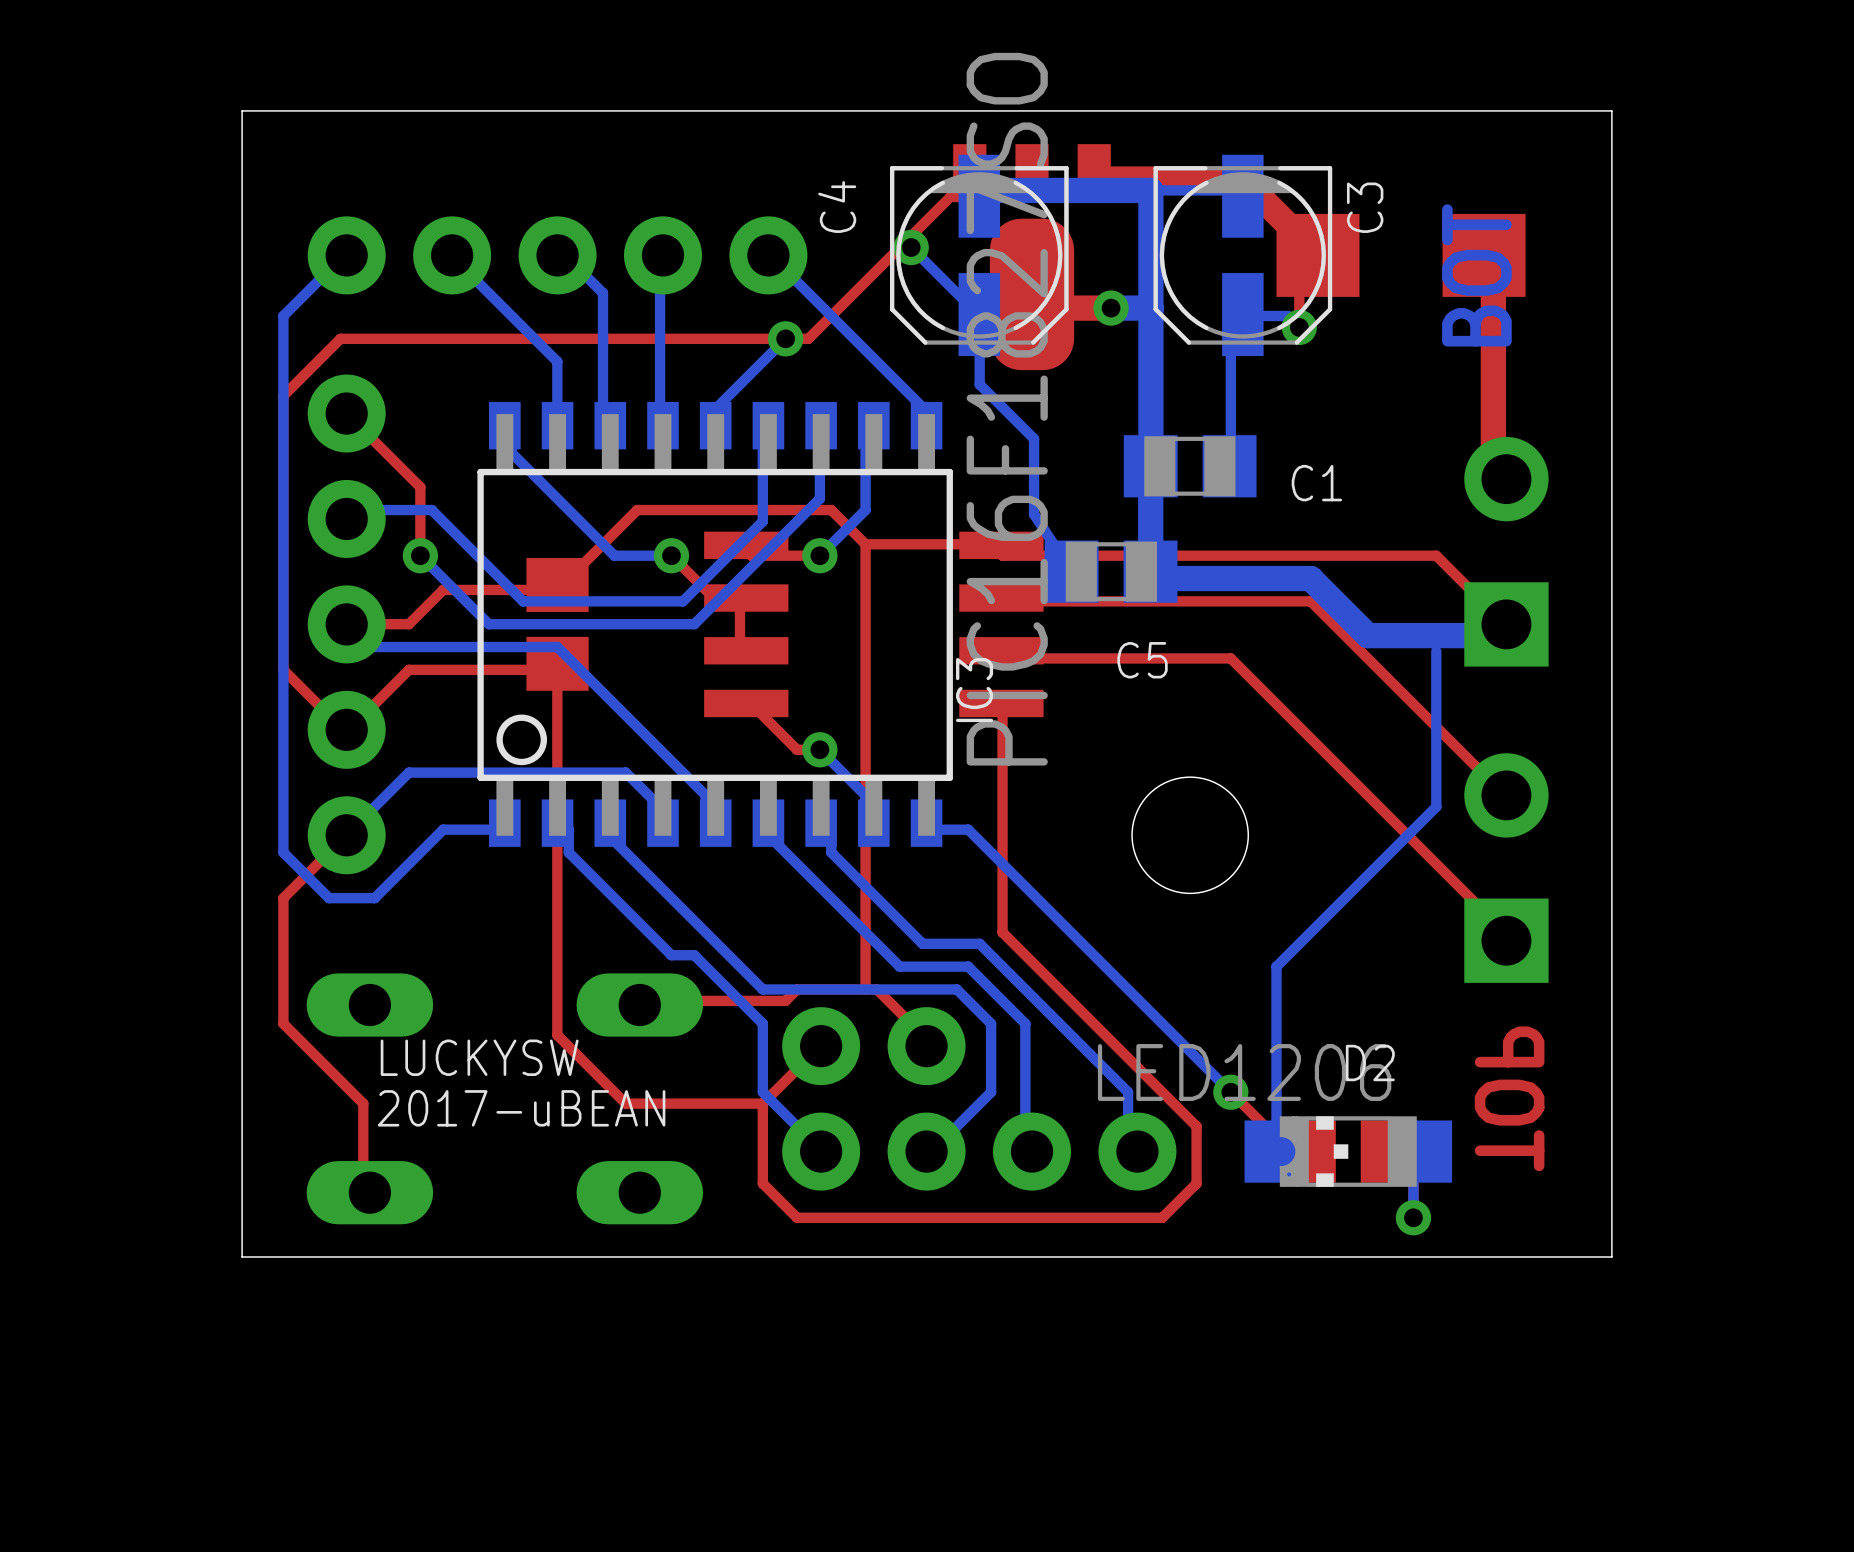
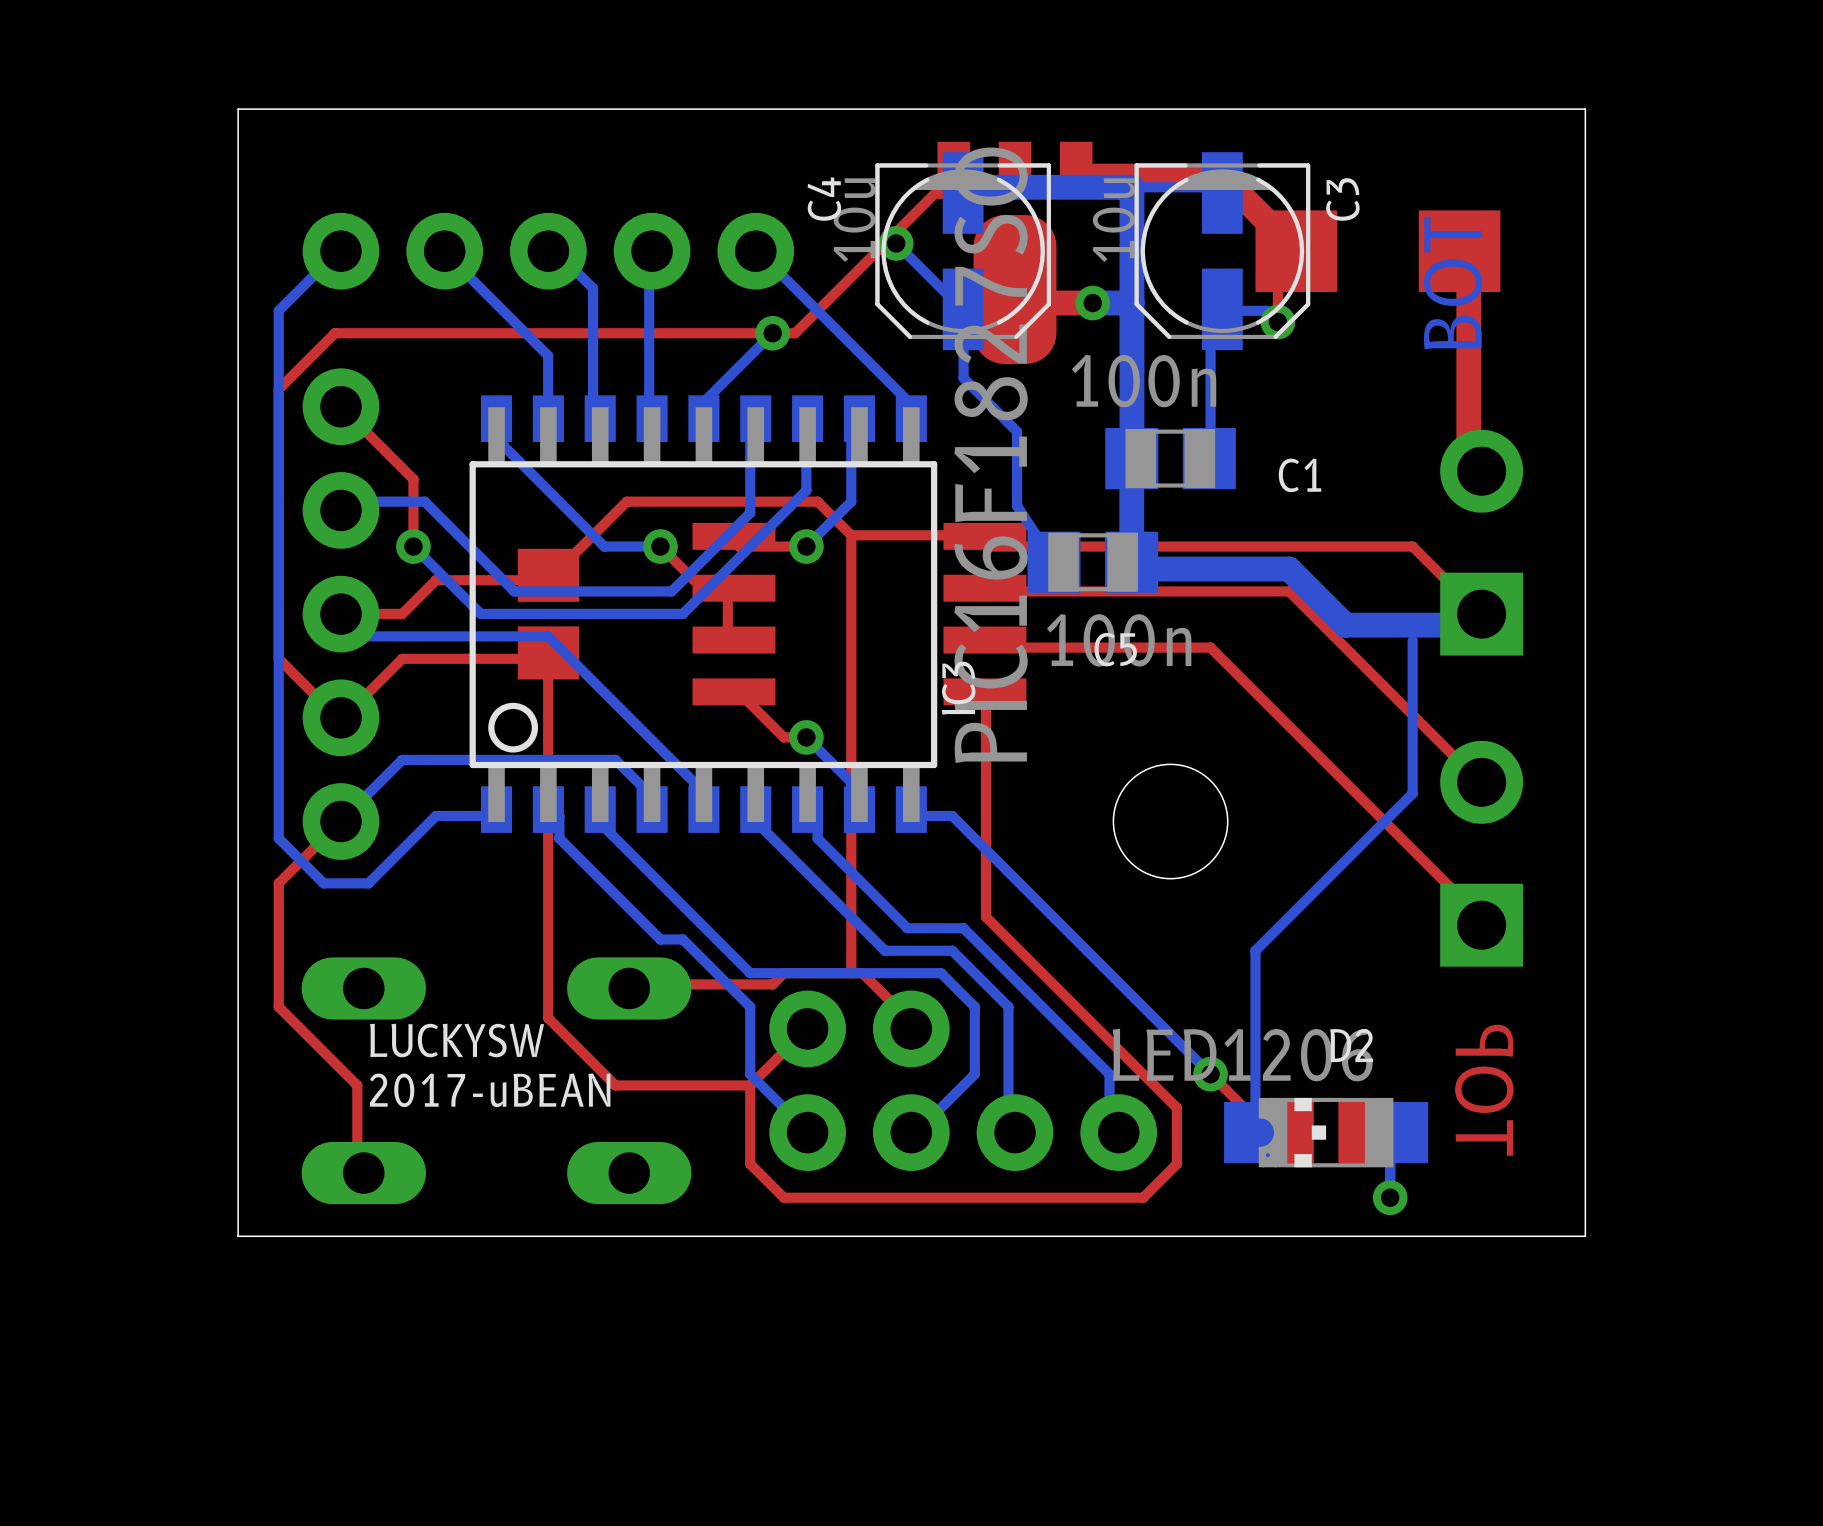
C4 value: none -> 10u (854, 220)
C3 value: none -> 10u (1113, 220)
C1 value: none -> 100n (1144, 381)
C5 value: none -> 100n (1119, 640)

